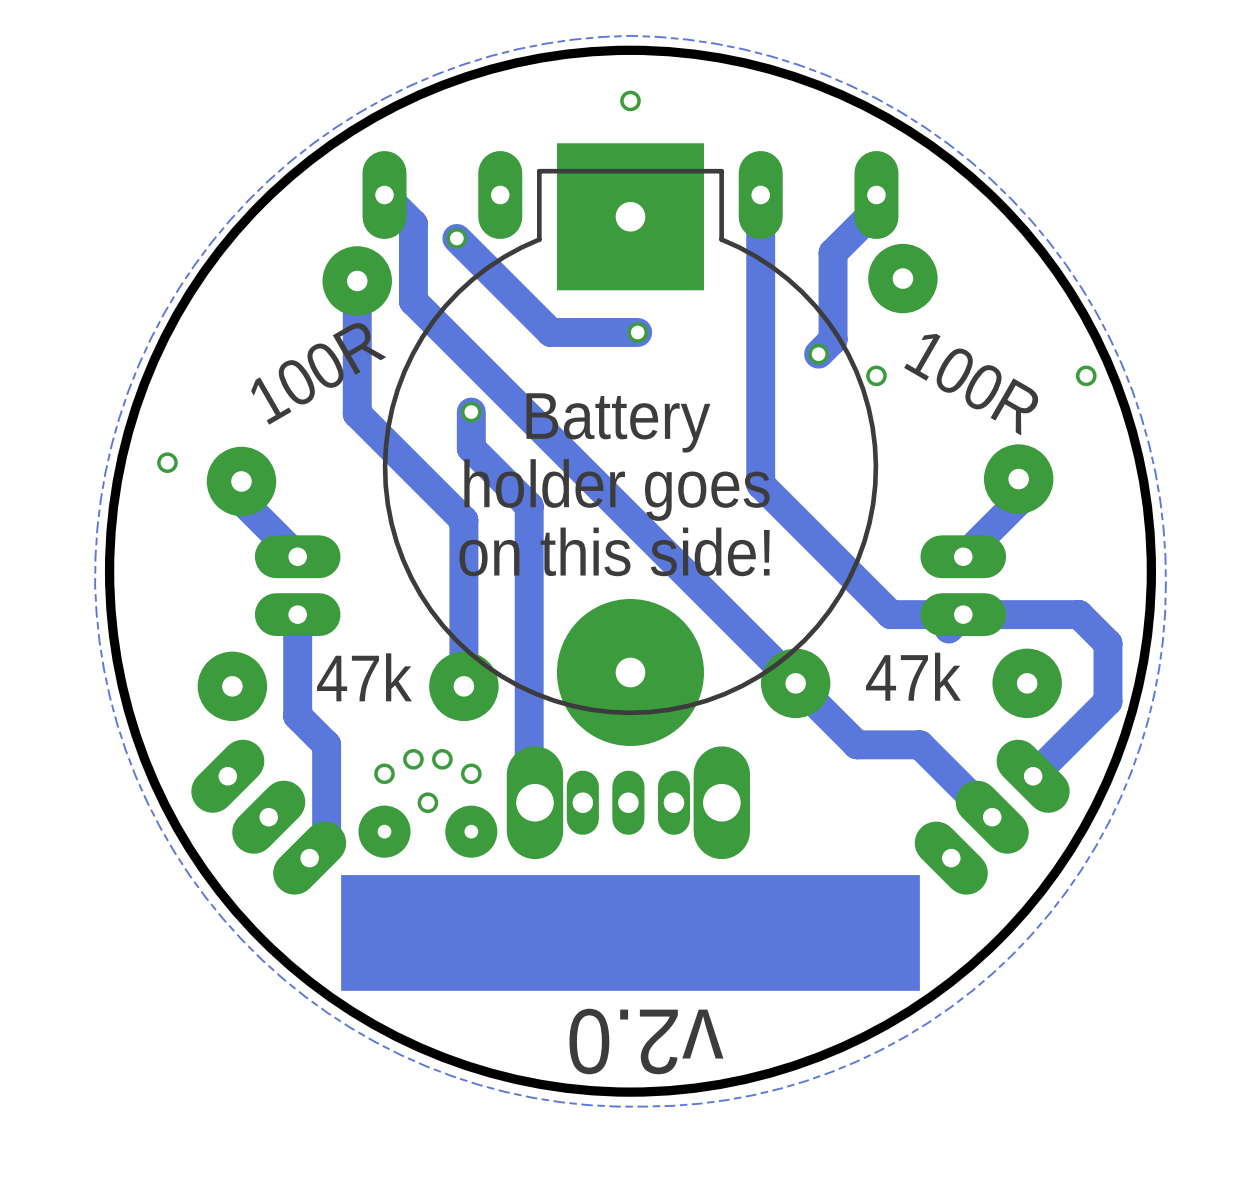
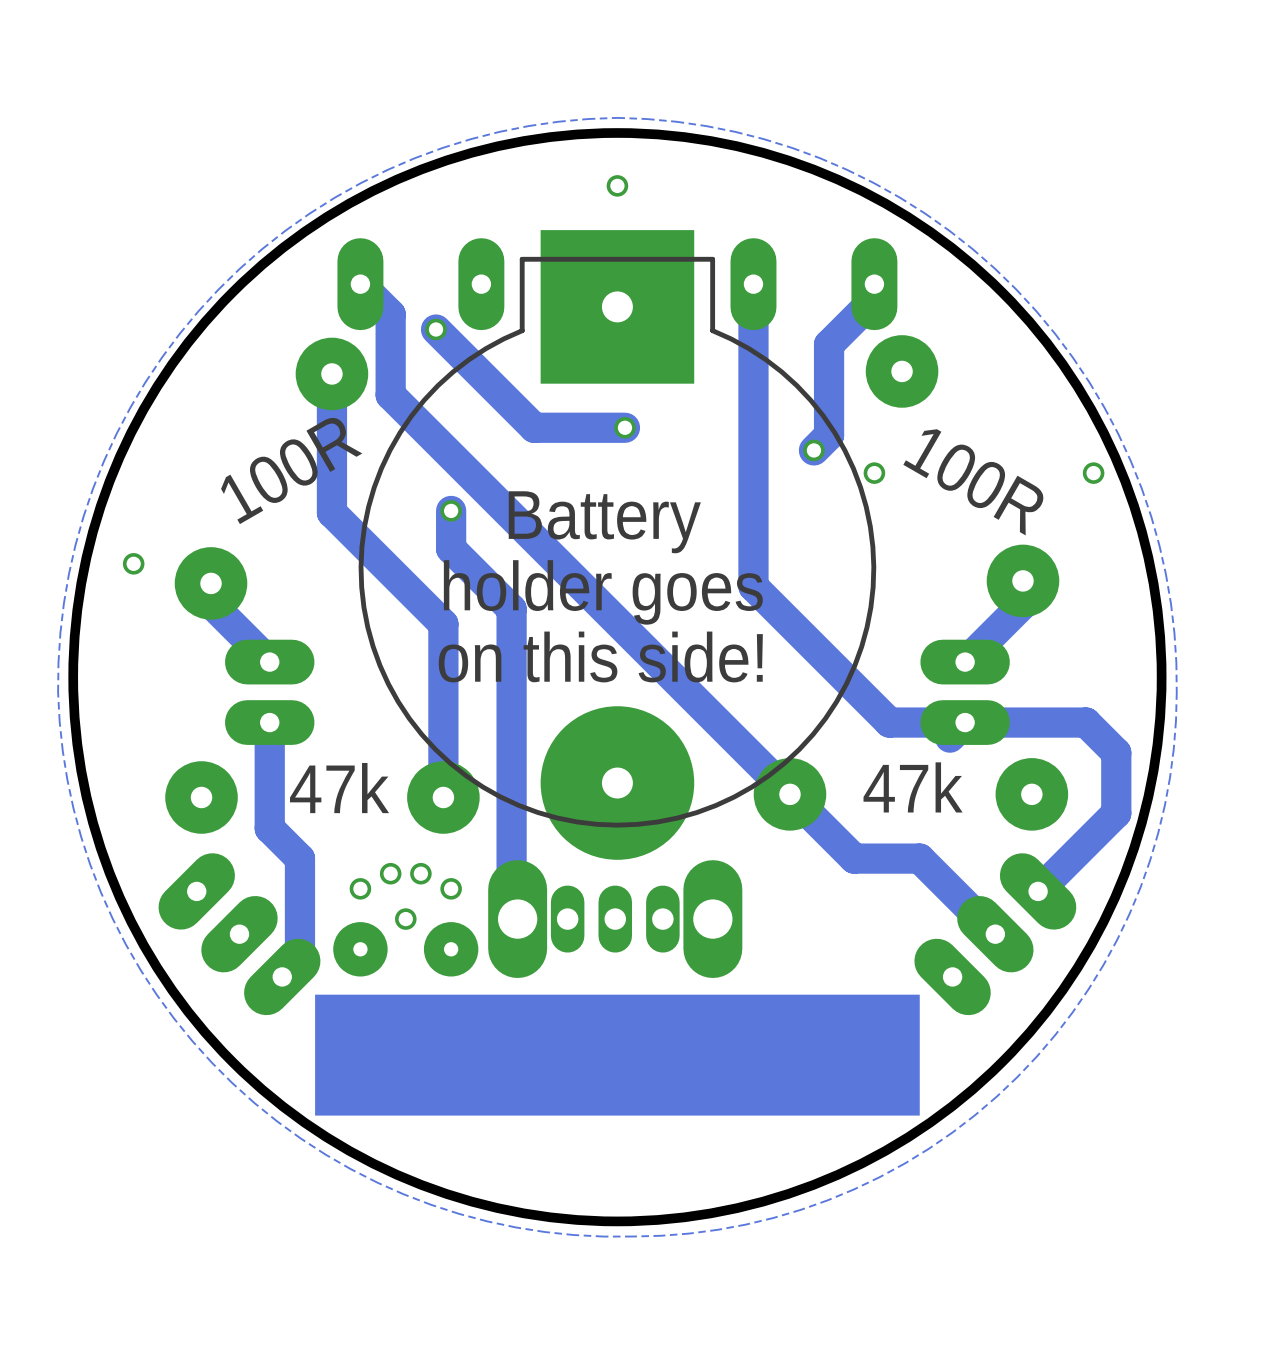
text: v2.0 (646, 1041) -> none

